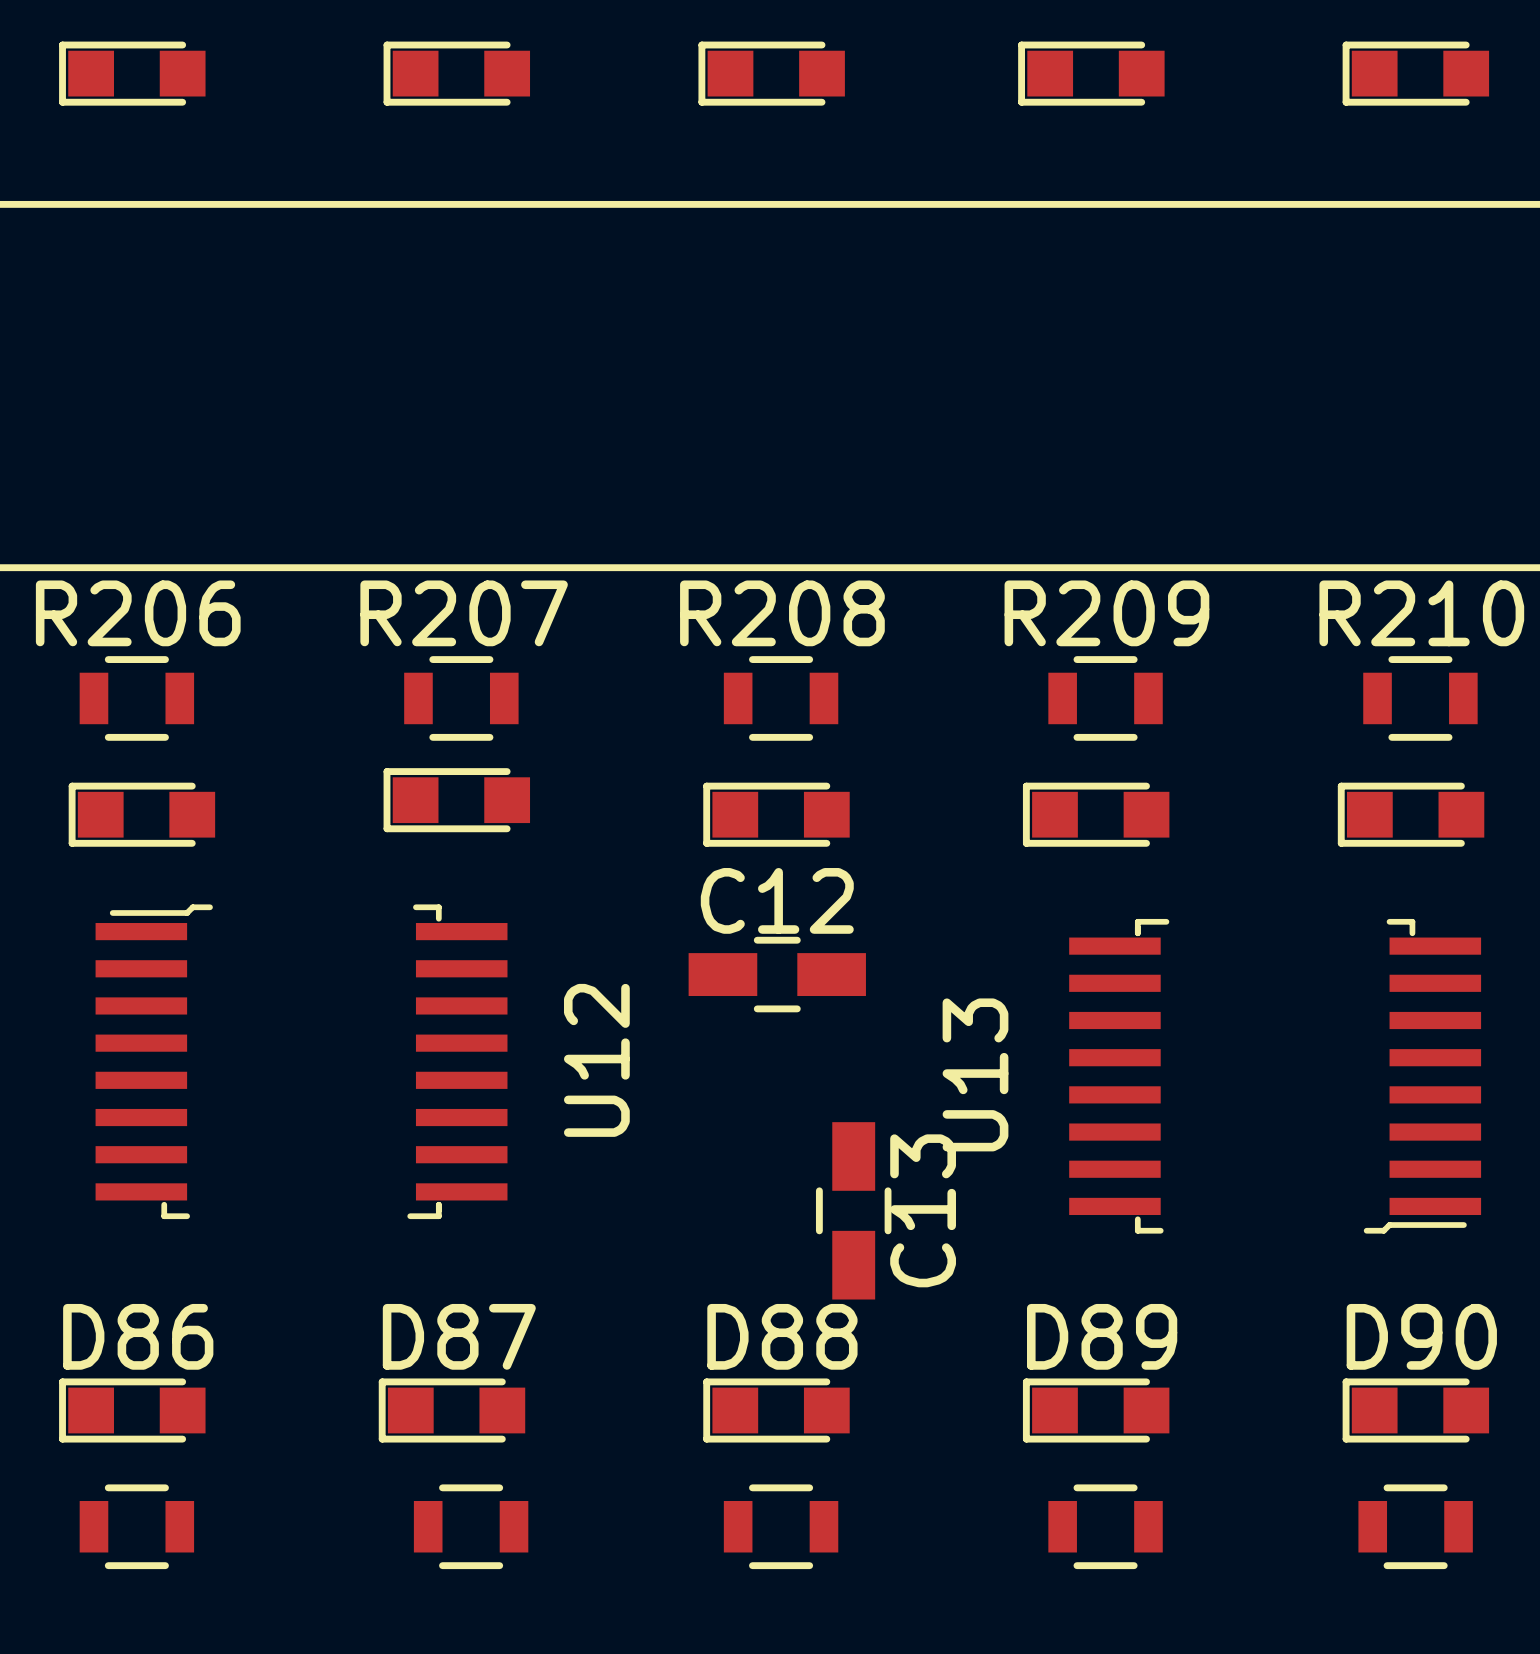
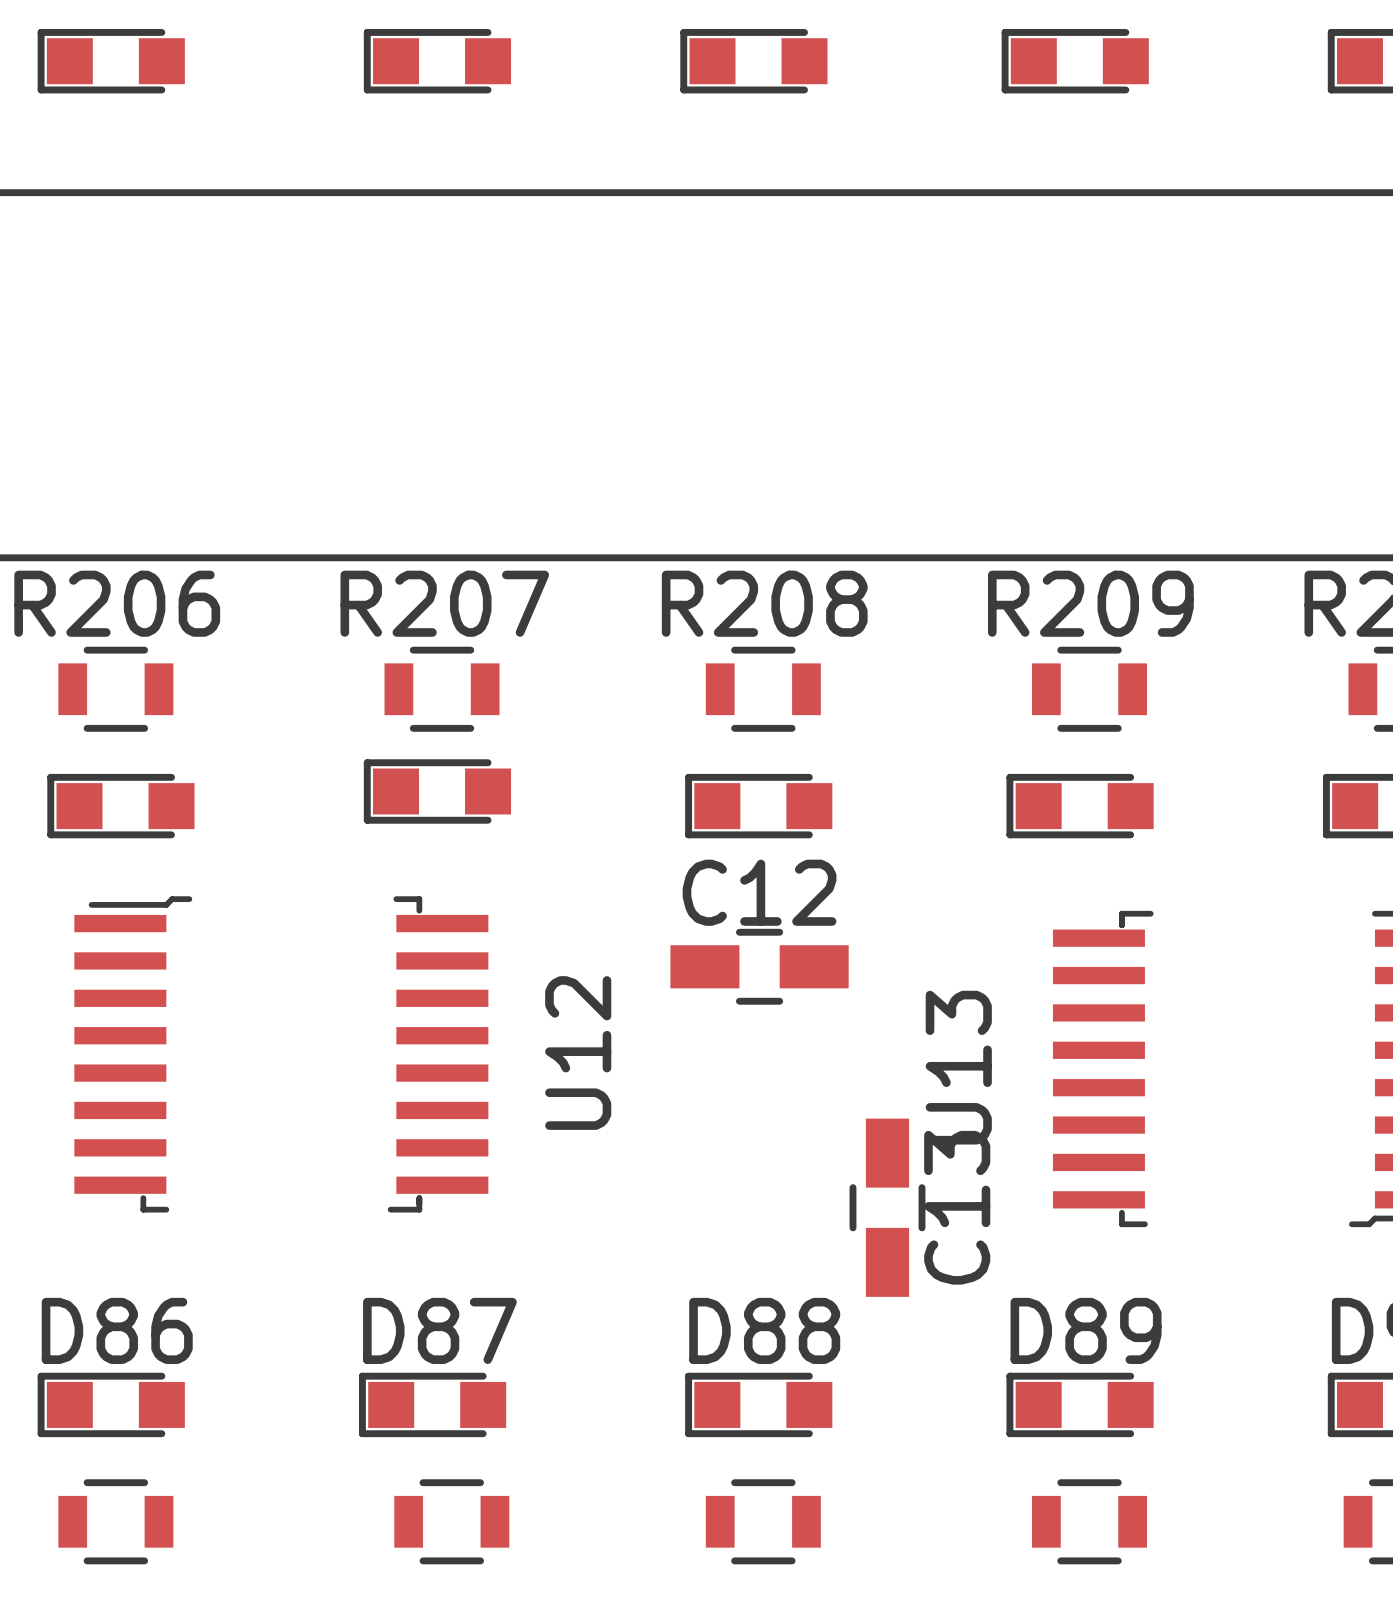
C13 position: (853, 1210) -> (887, 1207)

